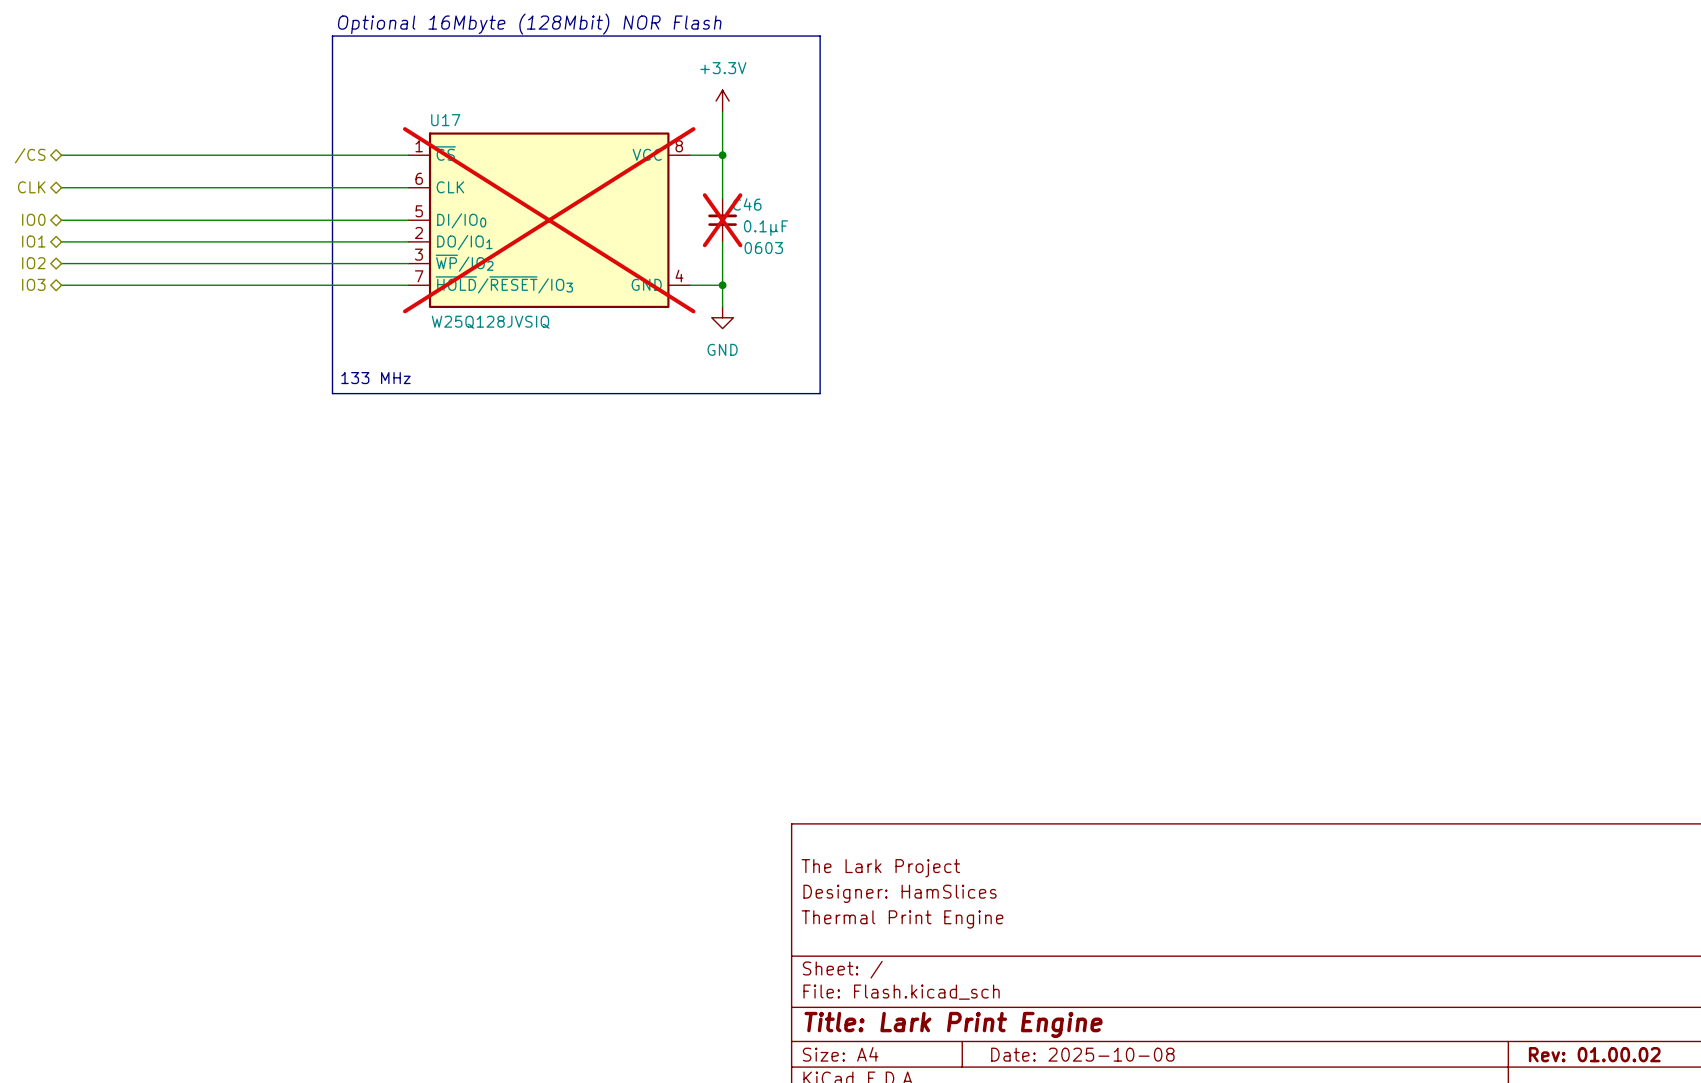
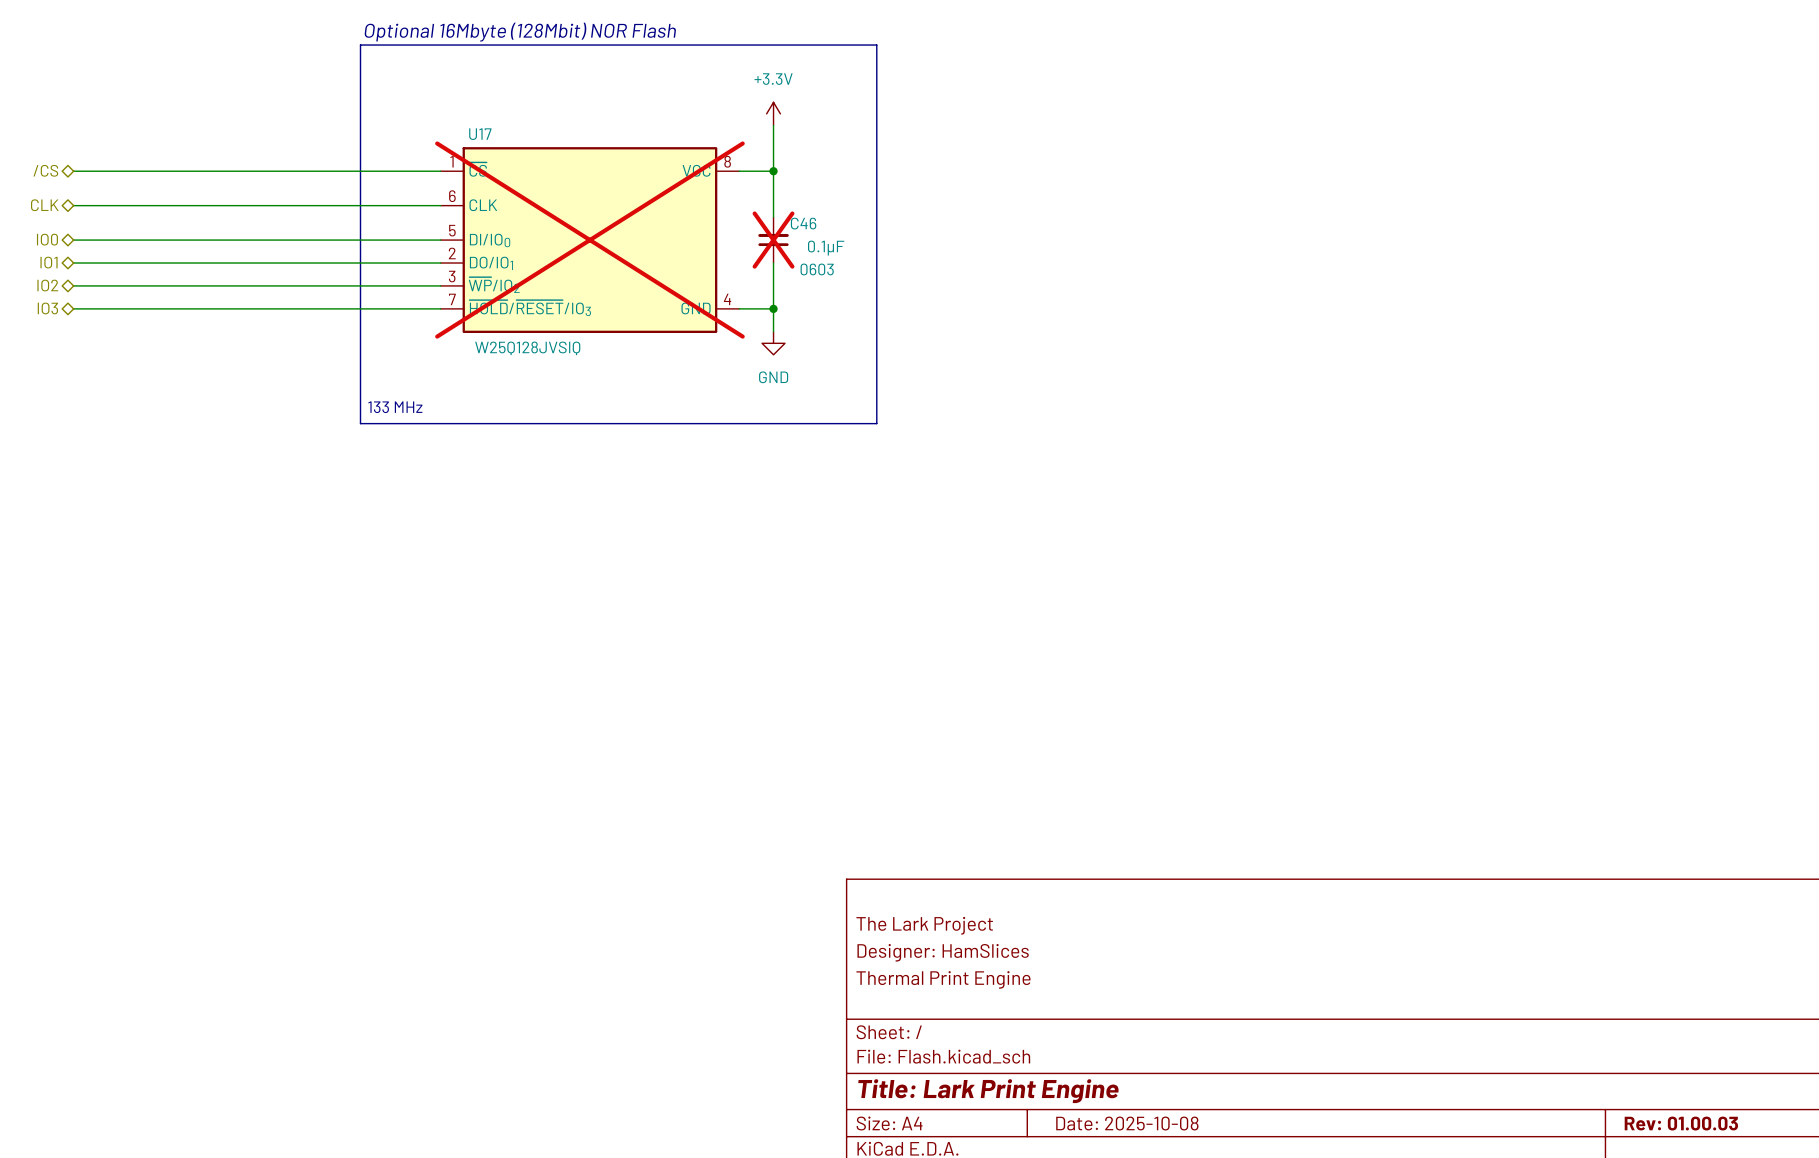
title block: Rev: 01.00.02 (1594, 1054) -> Rev: 01.00.03 (1681, 1123)

